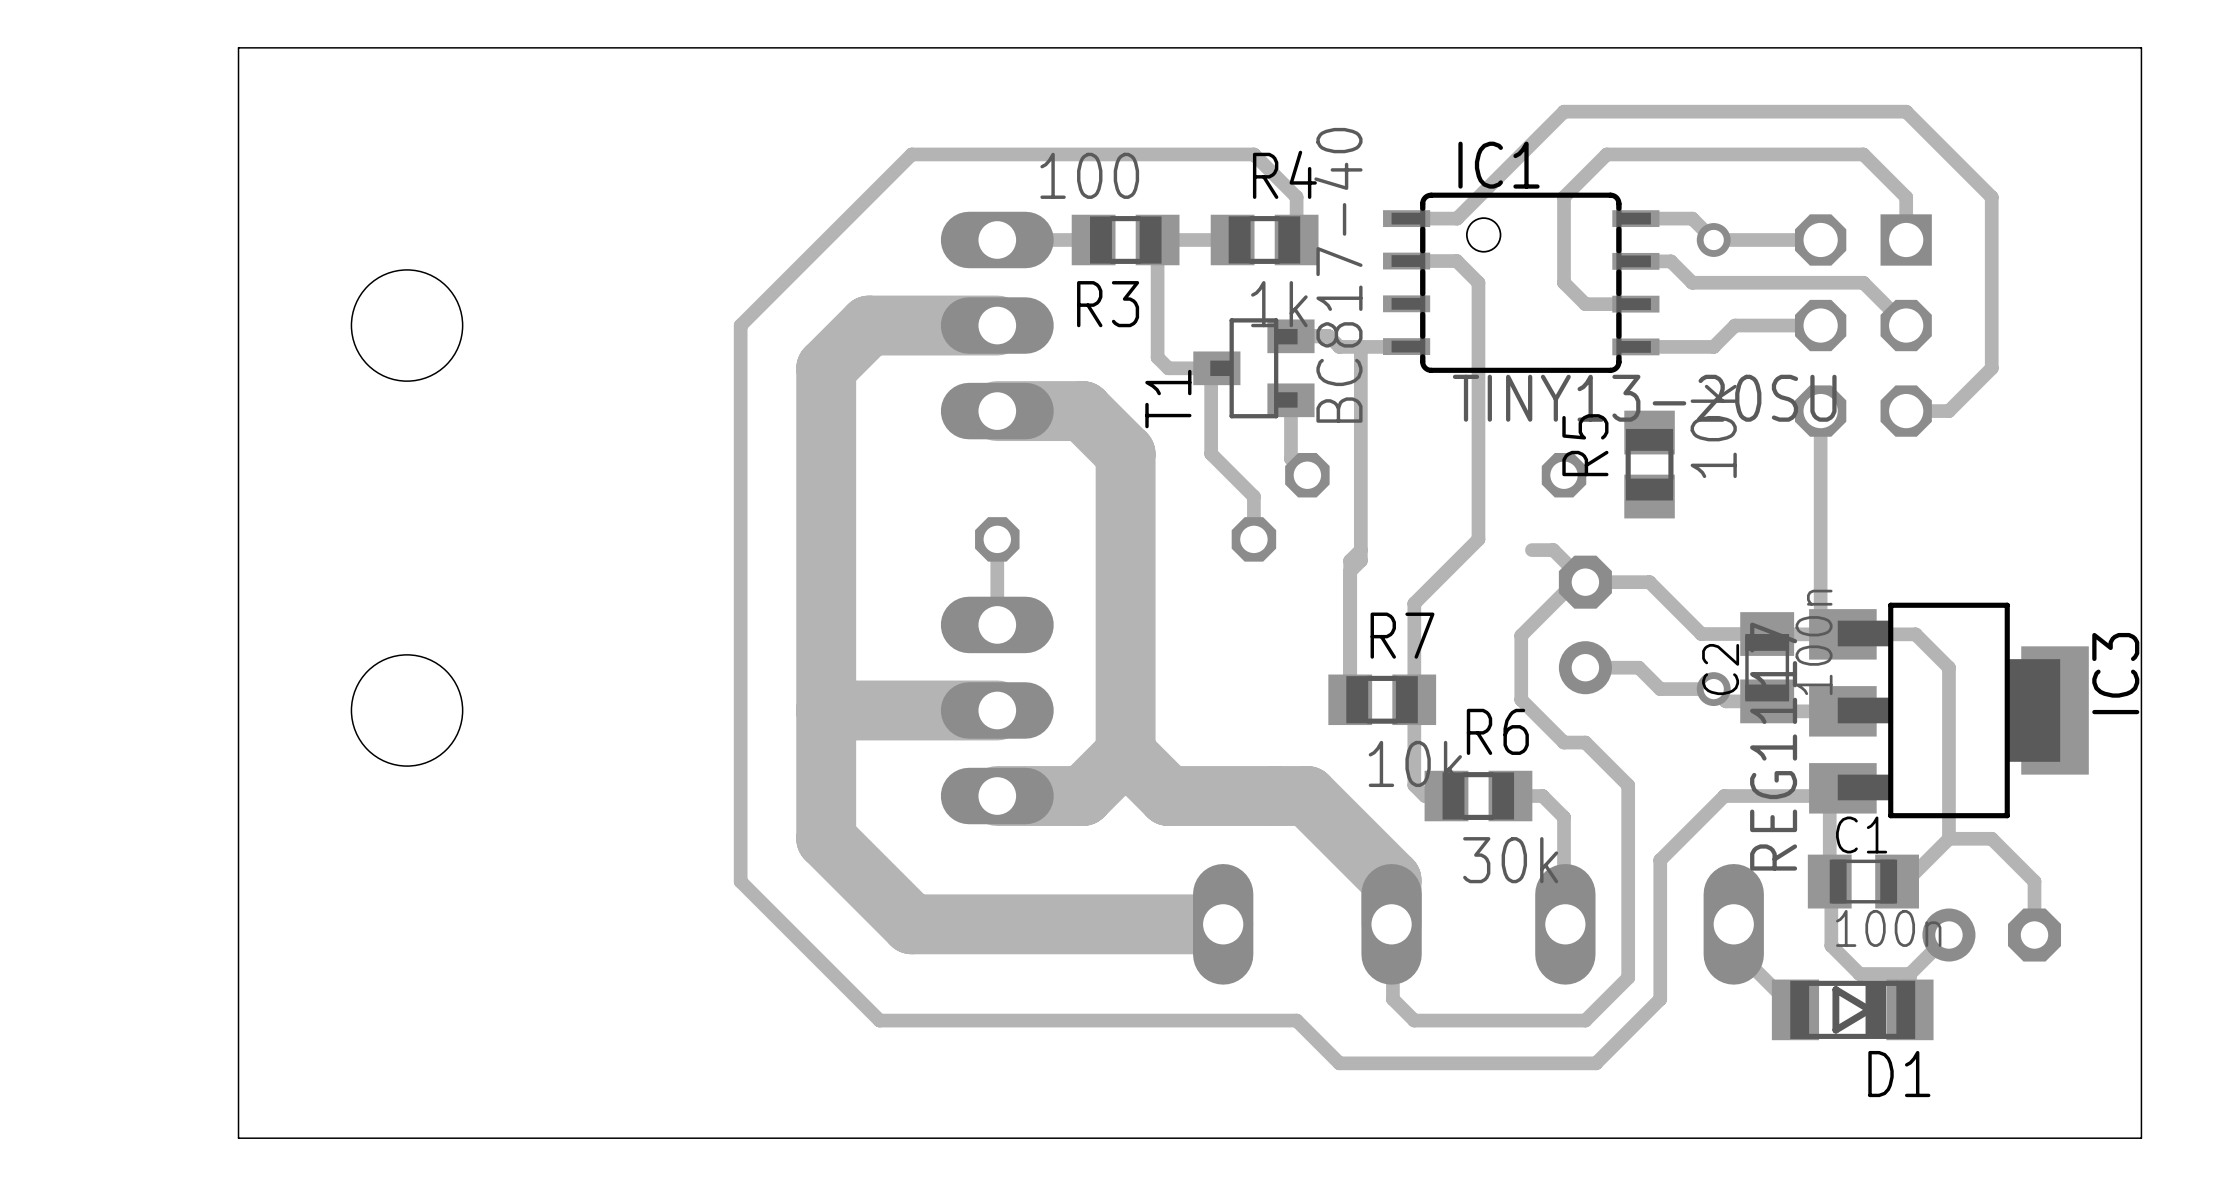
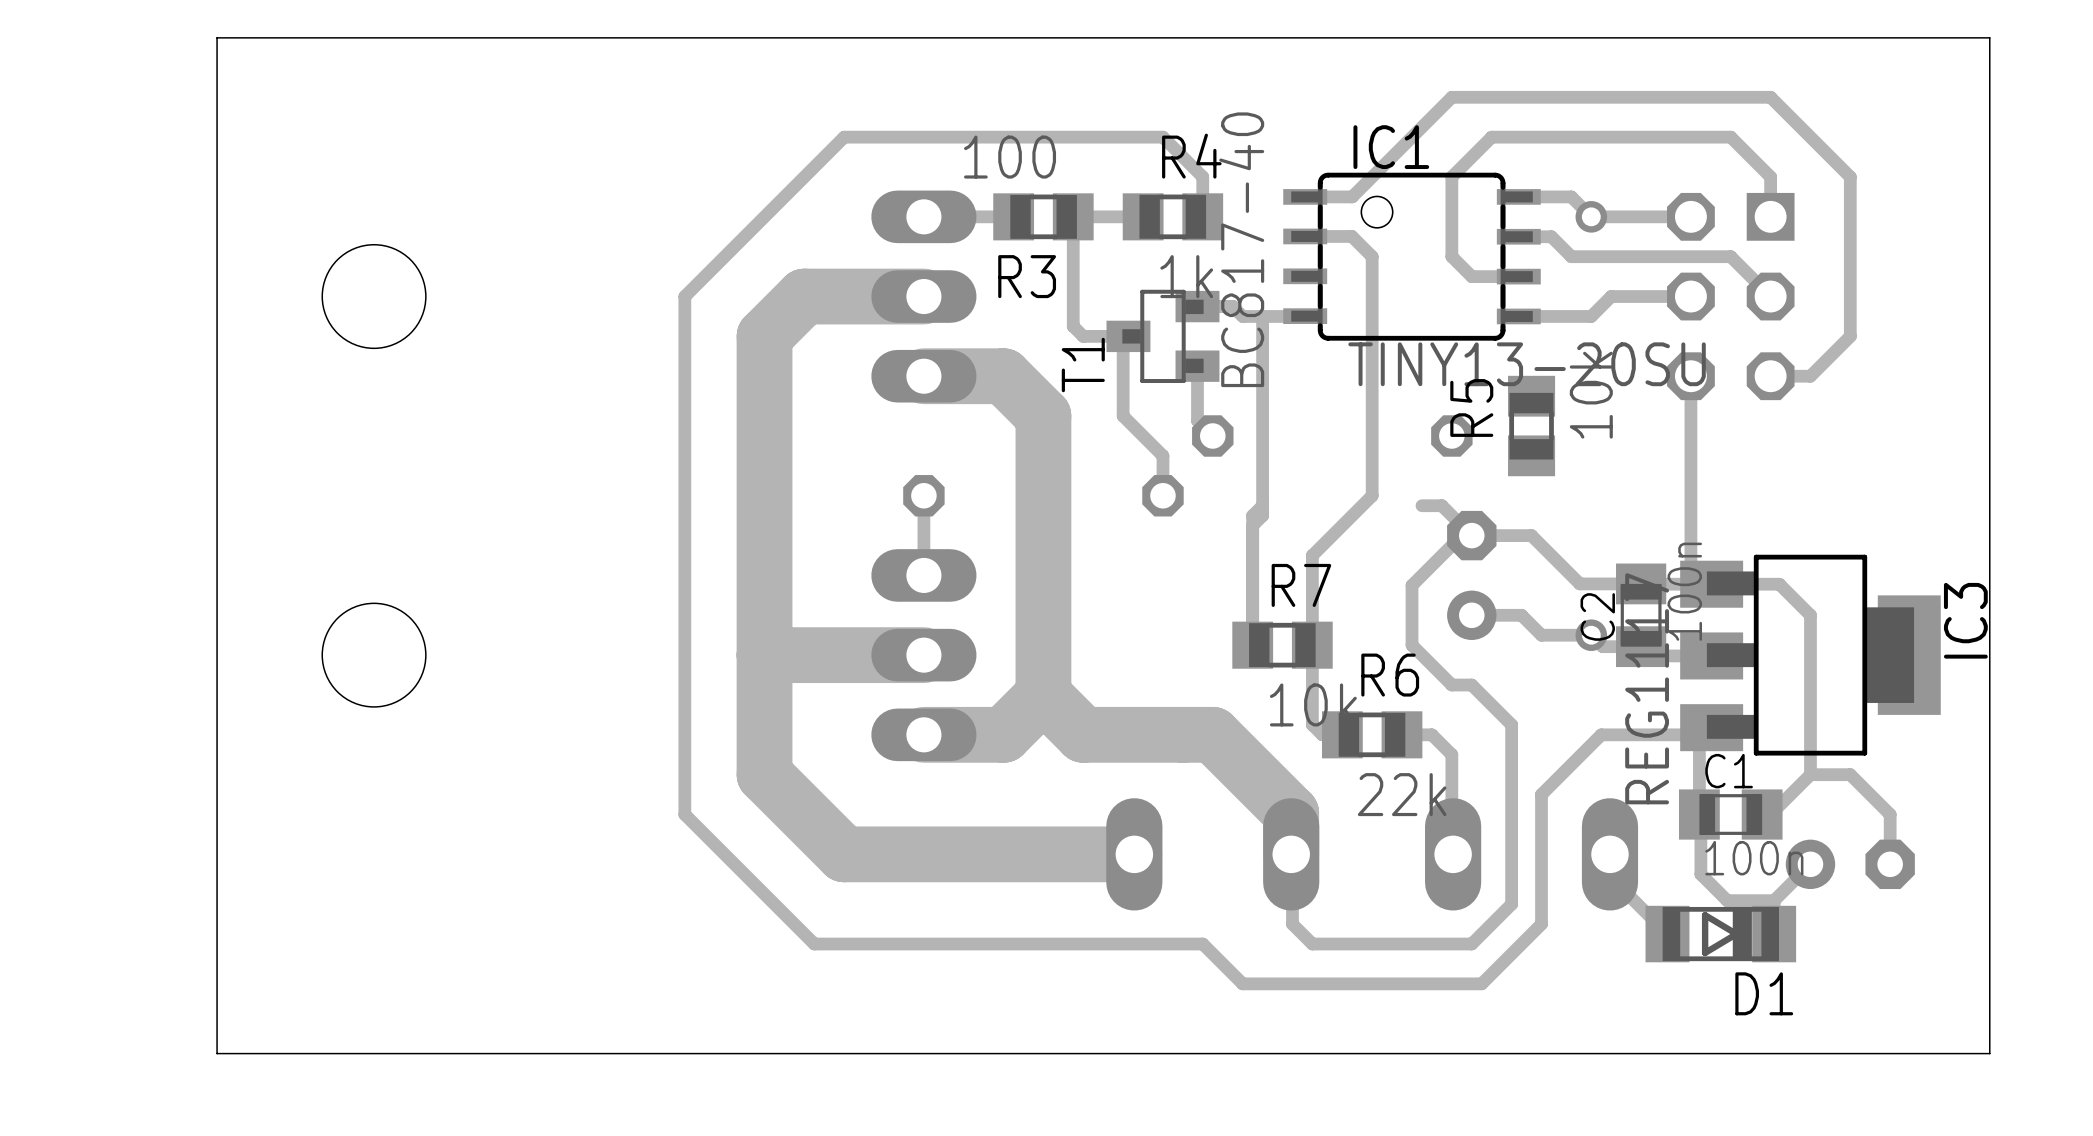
R6 value: 30k (1510, 860) -> 22k (1402, 794)

